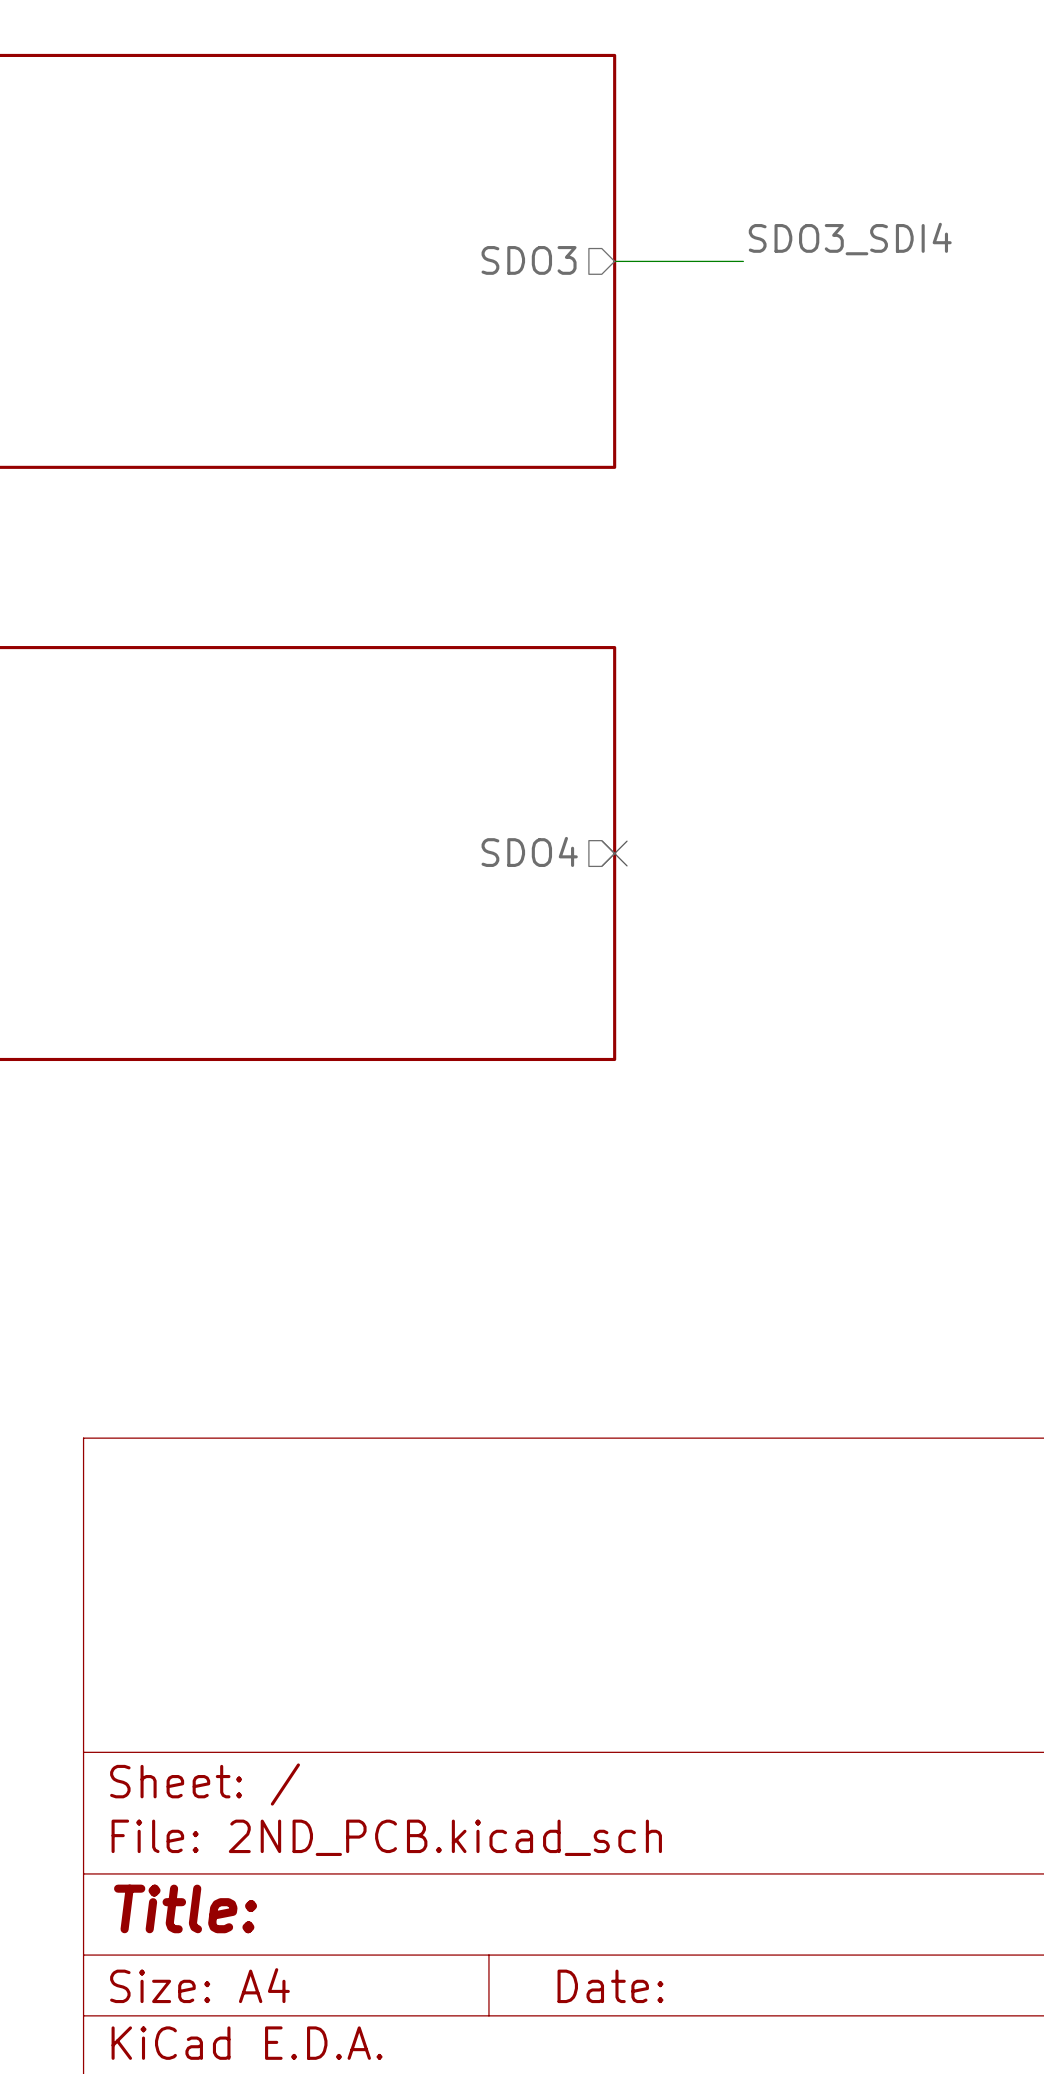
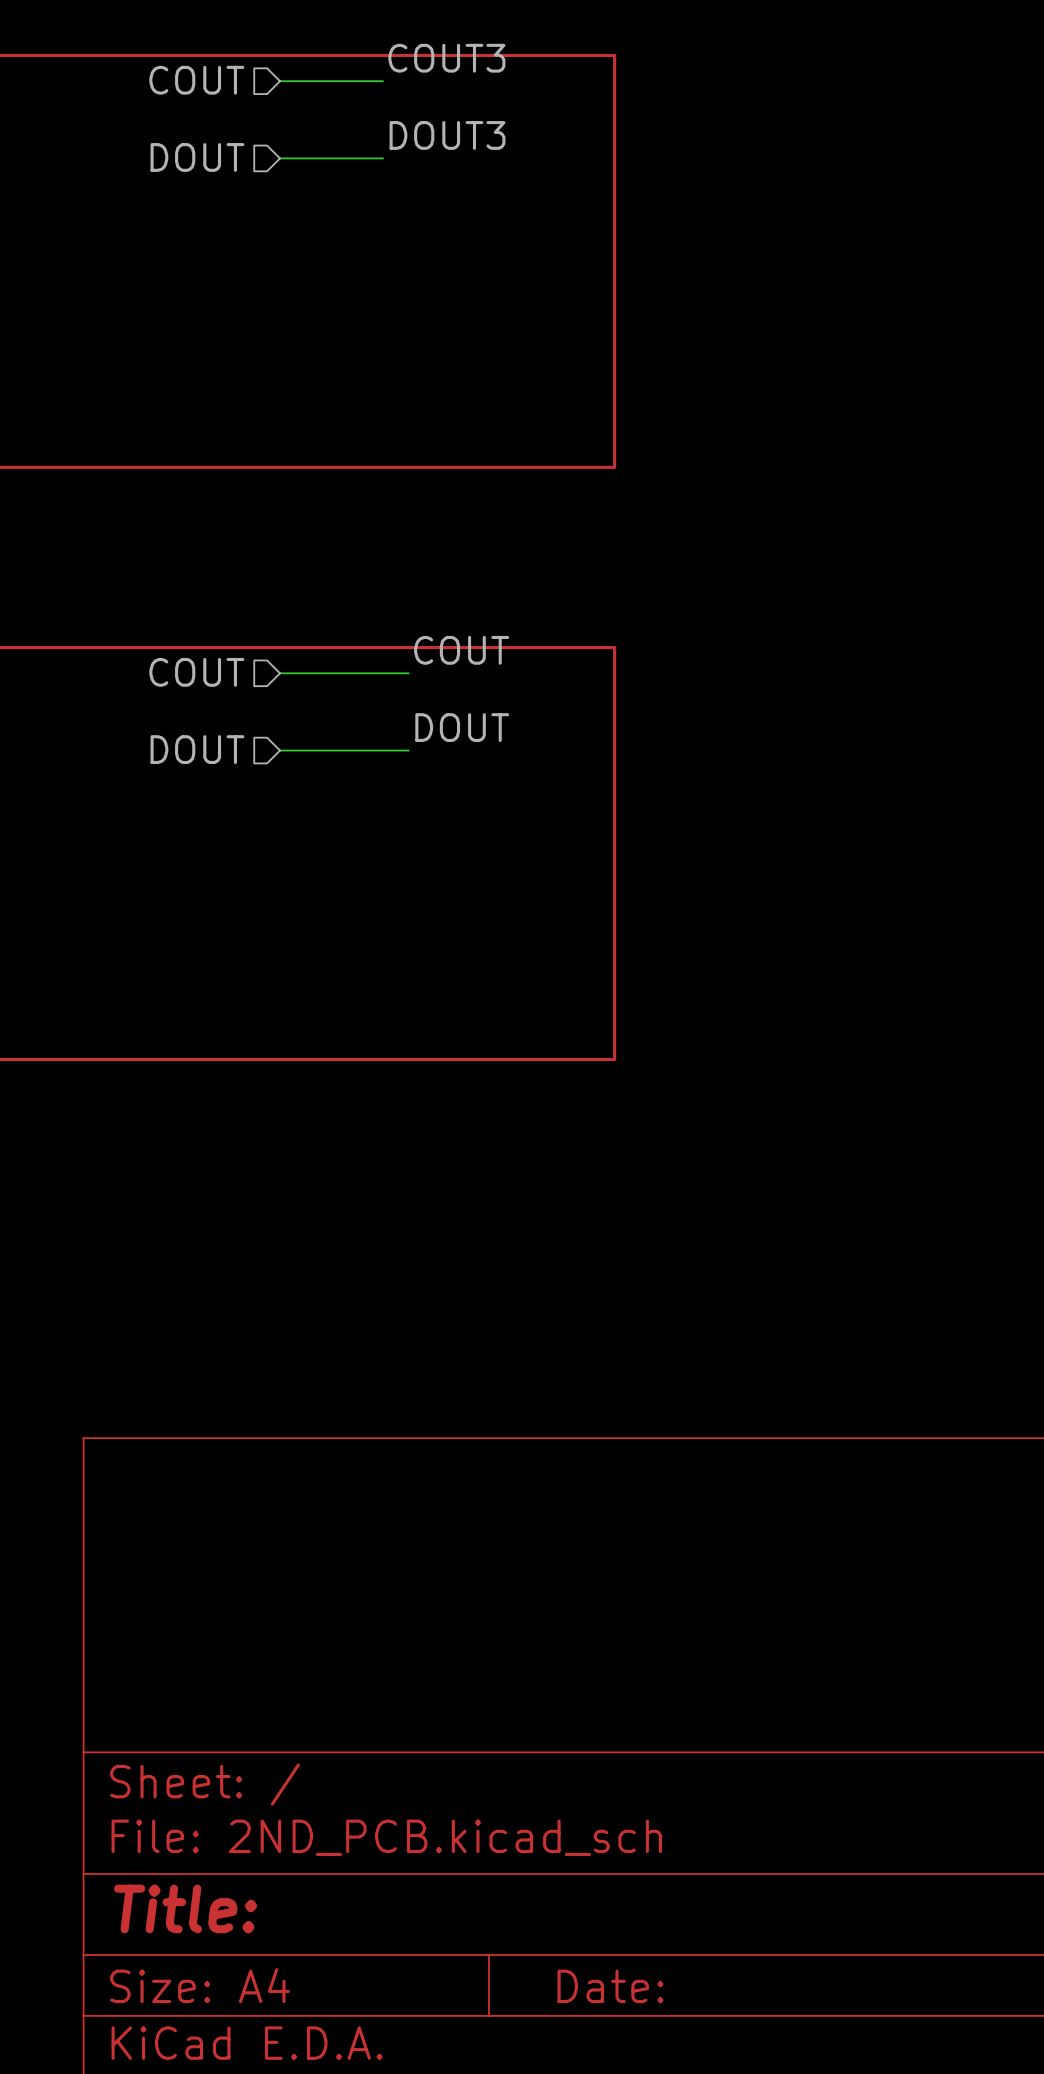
label: none -> COUT3 (446, 58)
sheet pin: none -> COUT (196, 80)
wire: none -> (279, 81) (382, 81)
label: none -> DOUT3 (447, 135)
sheet pin: none -> DOUT (197, 157)
wire: none -> (279, 158) (382, 158)
label: SDO3_SDI4 (850, 239) -> none
sheet pin: SDO3 (529, 260) -> none
wire: (614, 261) (743, 261) -> none
label: none -> COUT (461, 650)
sheet pin: none -> COUT (196, 672)
wire: none -> (279, 673) (408, 673)
label: none -> DOUT (462, 727)
sheet pin: none -> DOUT (197, 749)
wire: none -> (279, 750) (408, 750)
sheet pin: SDO4 (529, 851) -> none
no-connect mark: (614, 853) -> none

